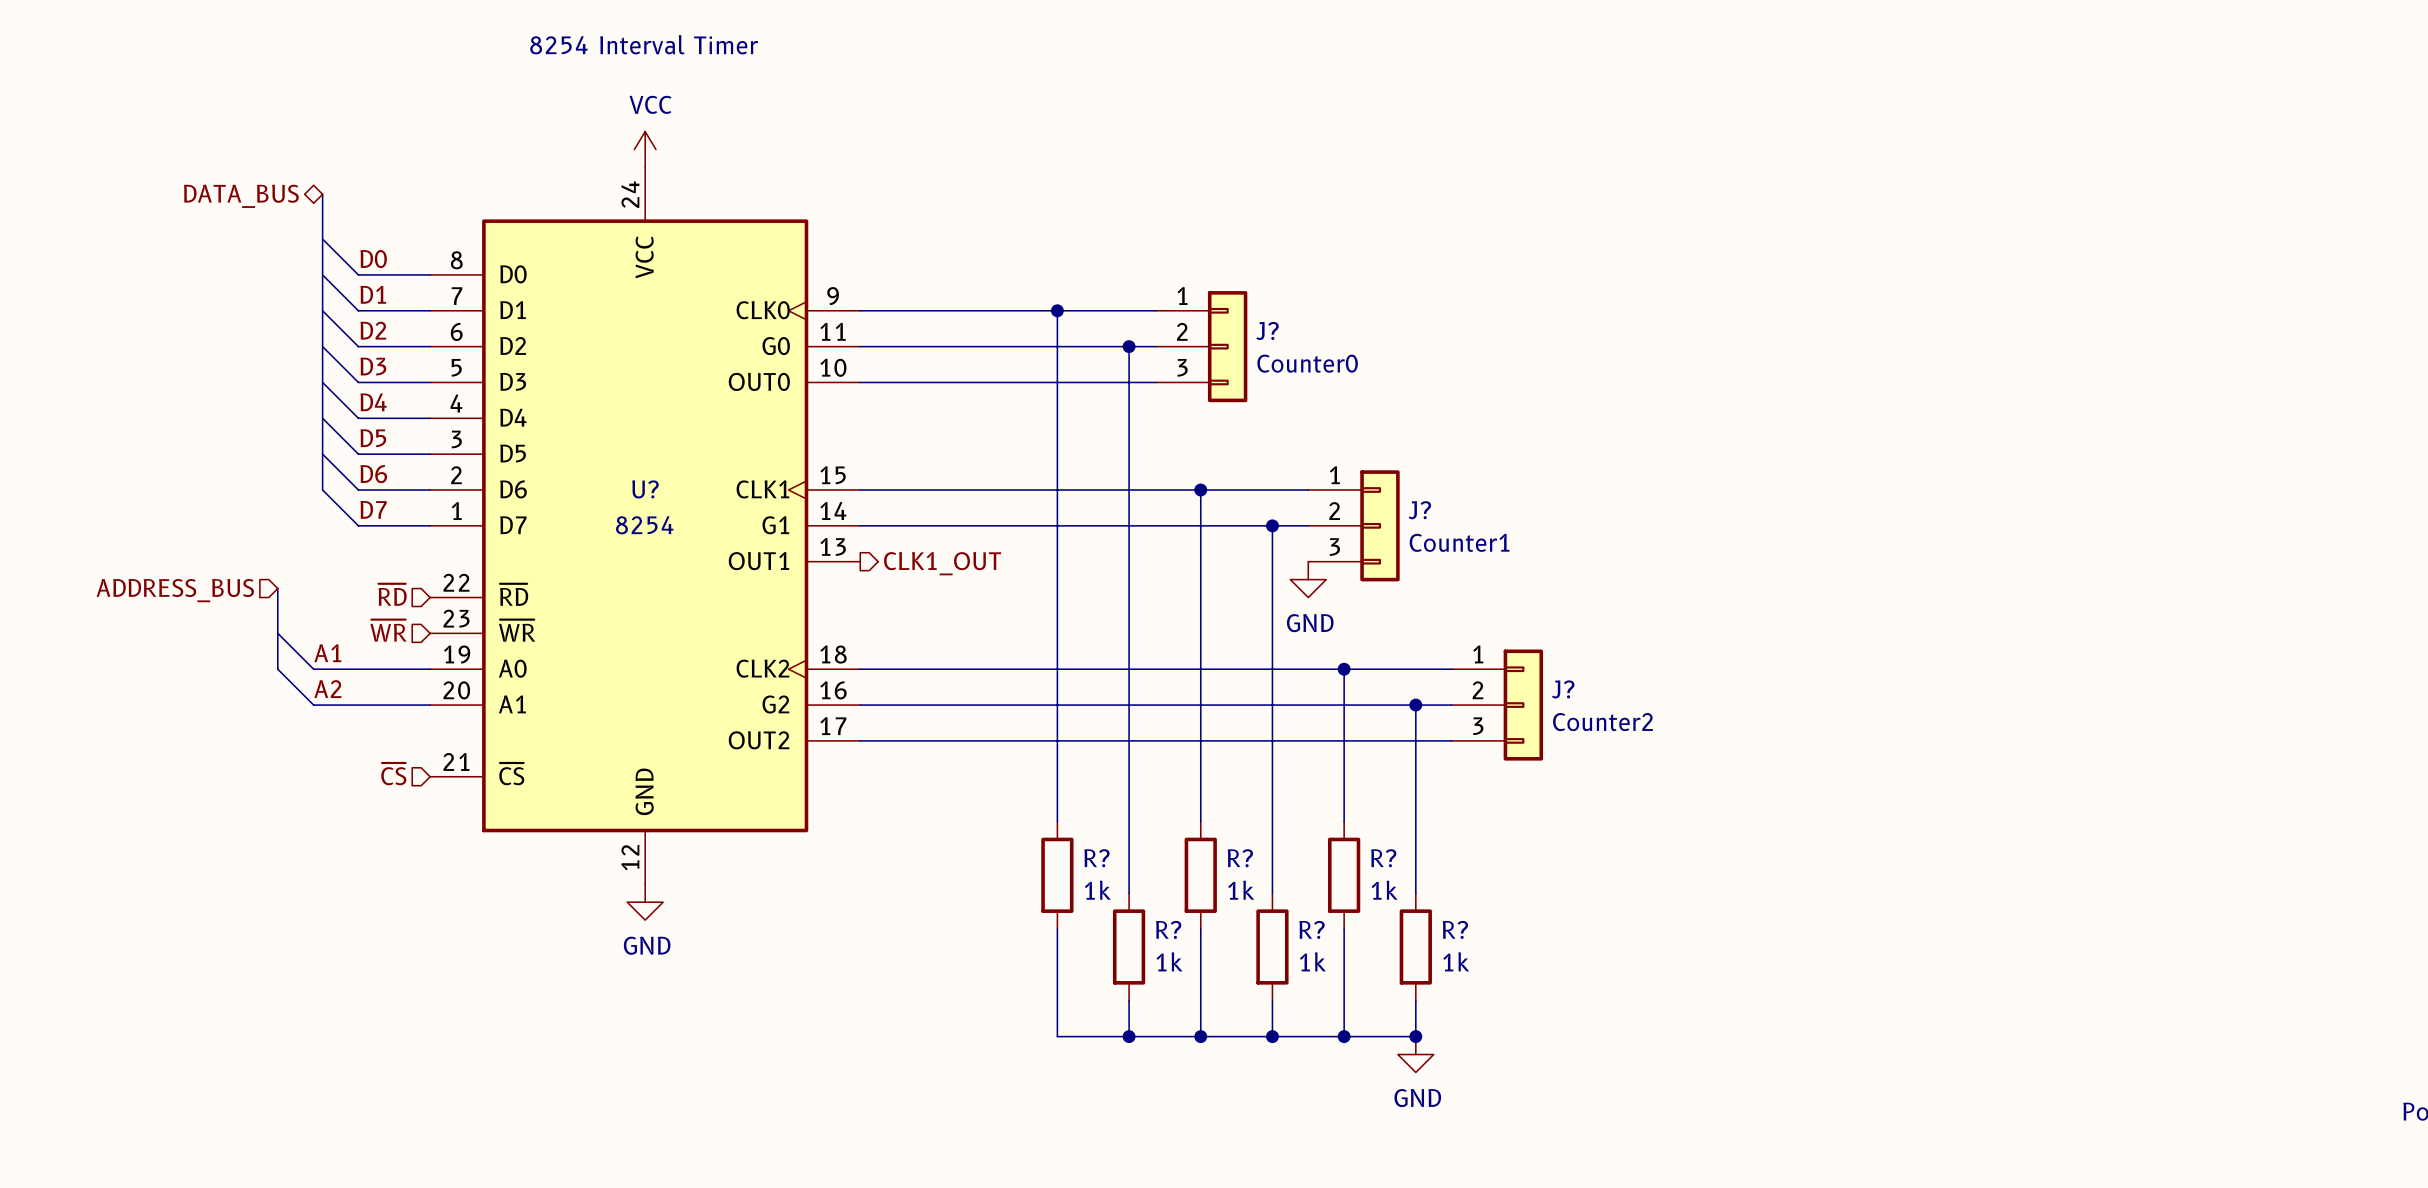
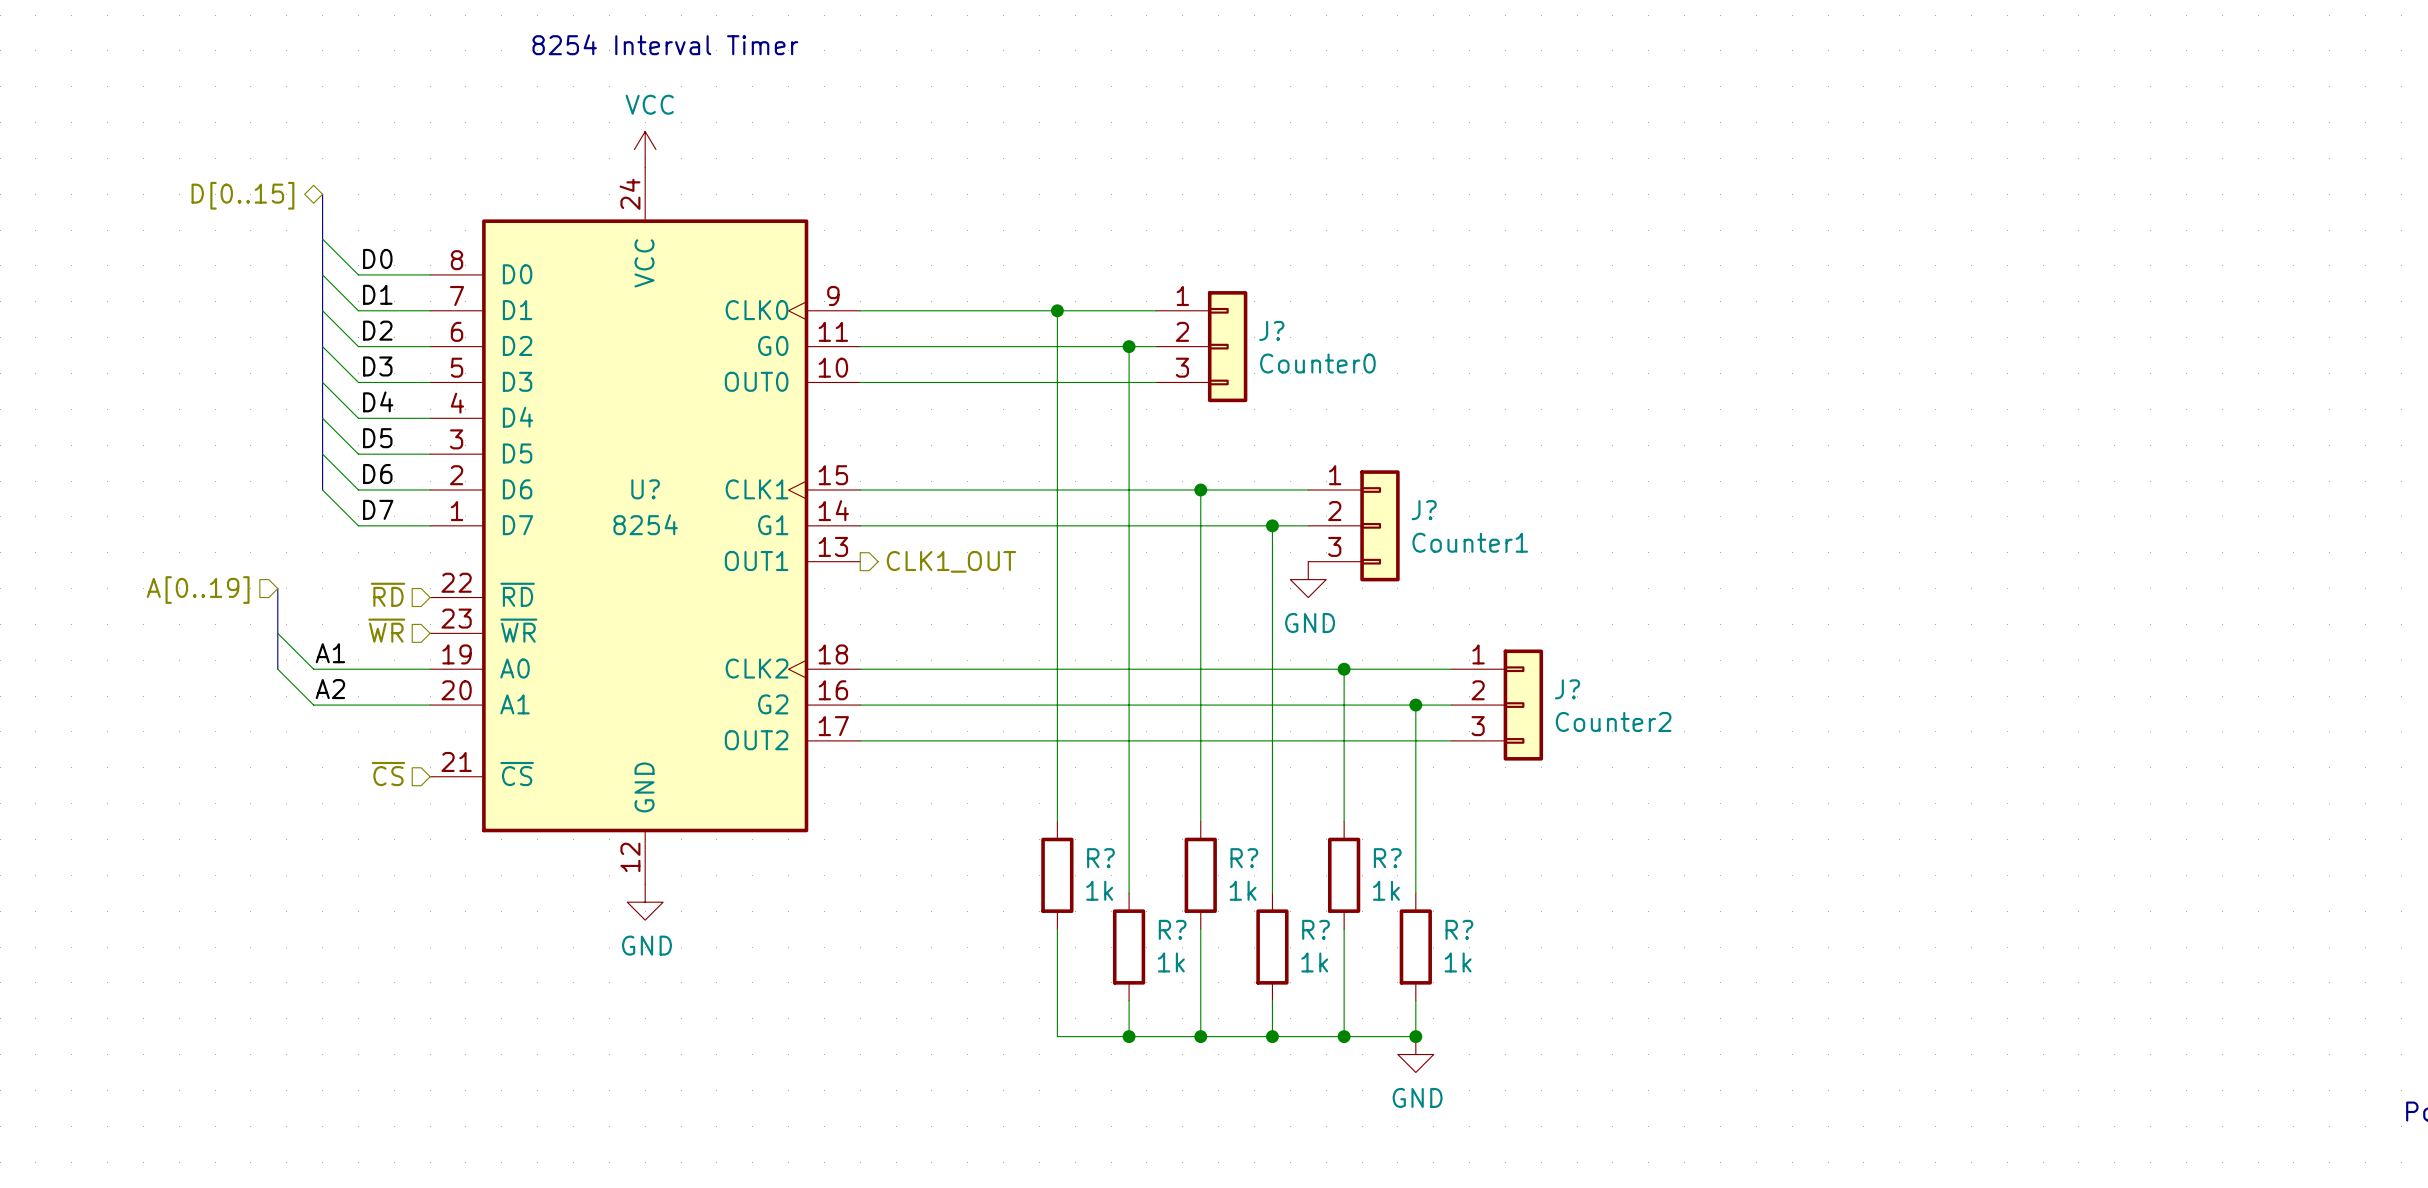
hierarchical label: DATA_BUS (241, 196) -> D[0..15] (242, 195)
hierarchical label: ADDRESS_BUS (175, 590) -> A[0..19] (198, 590)

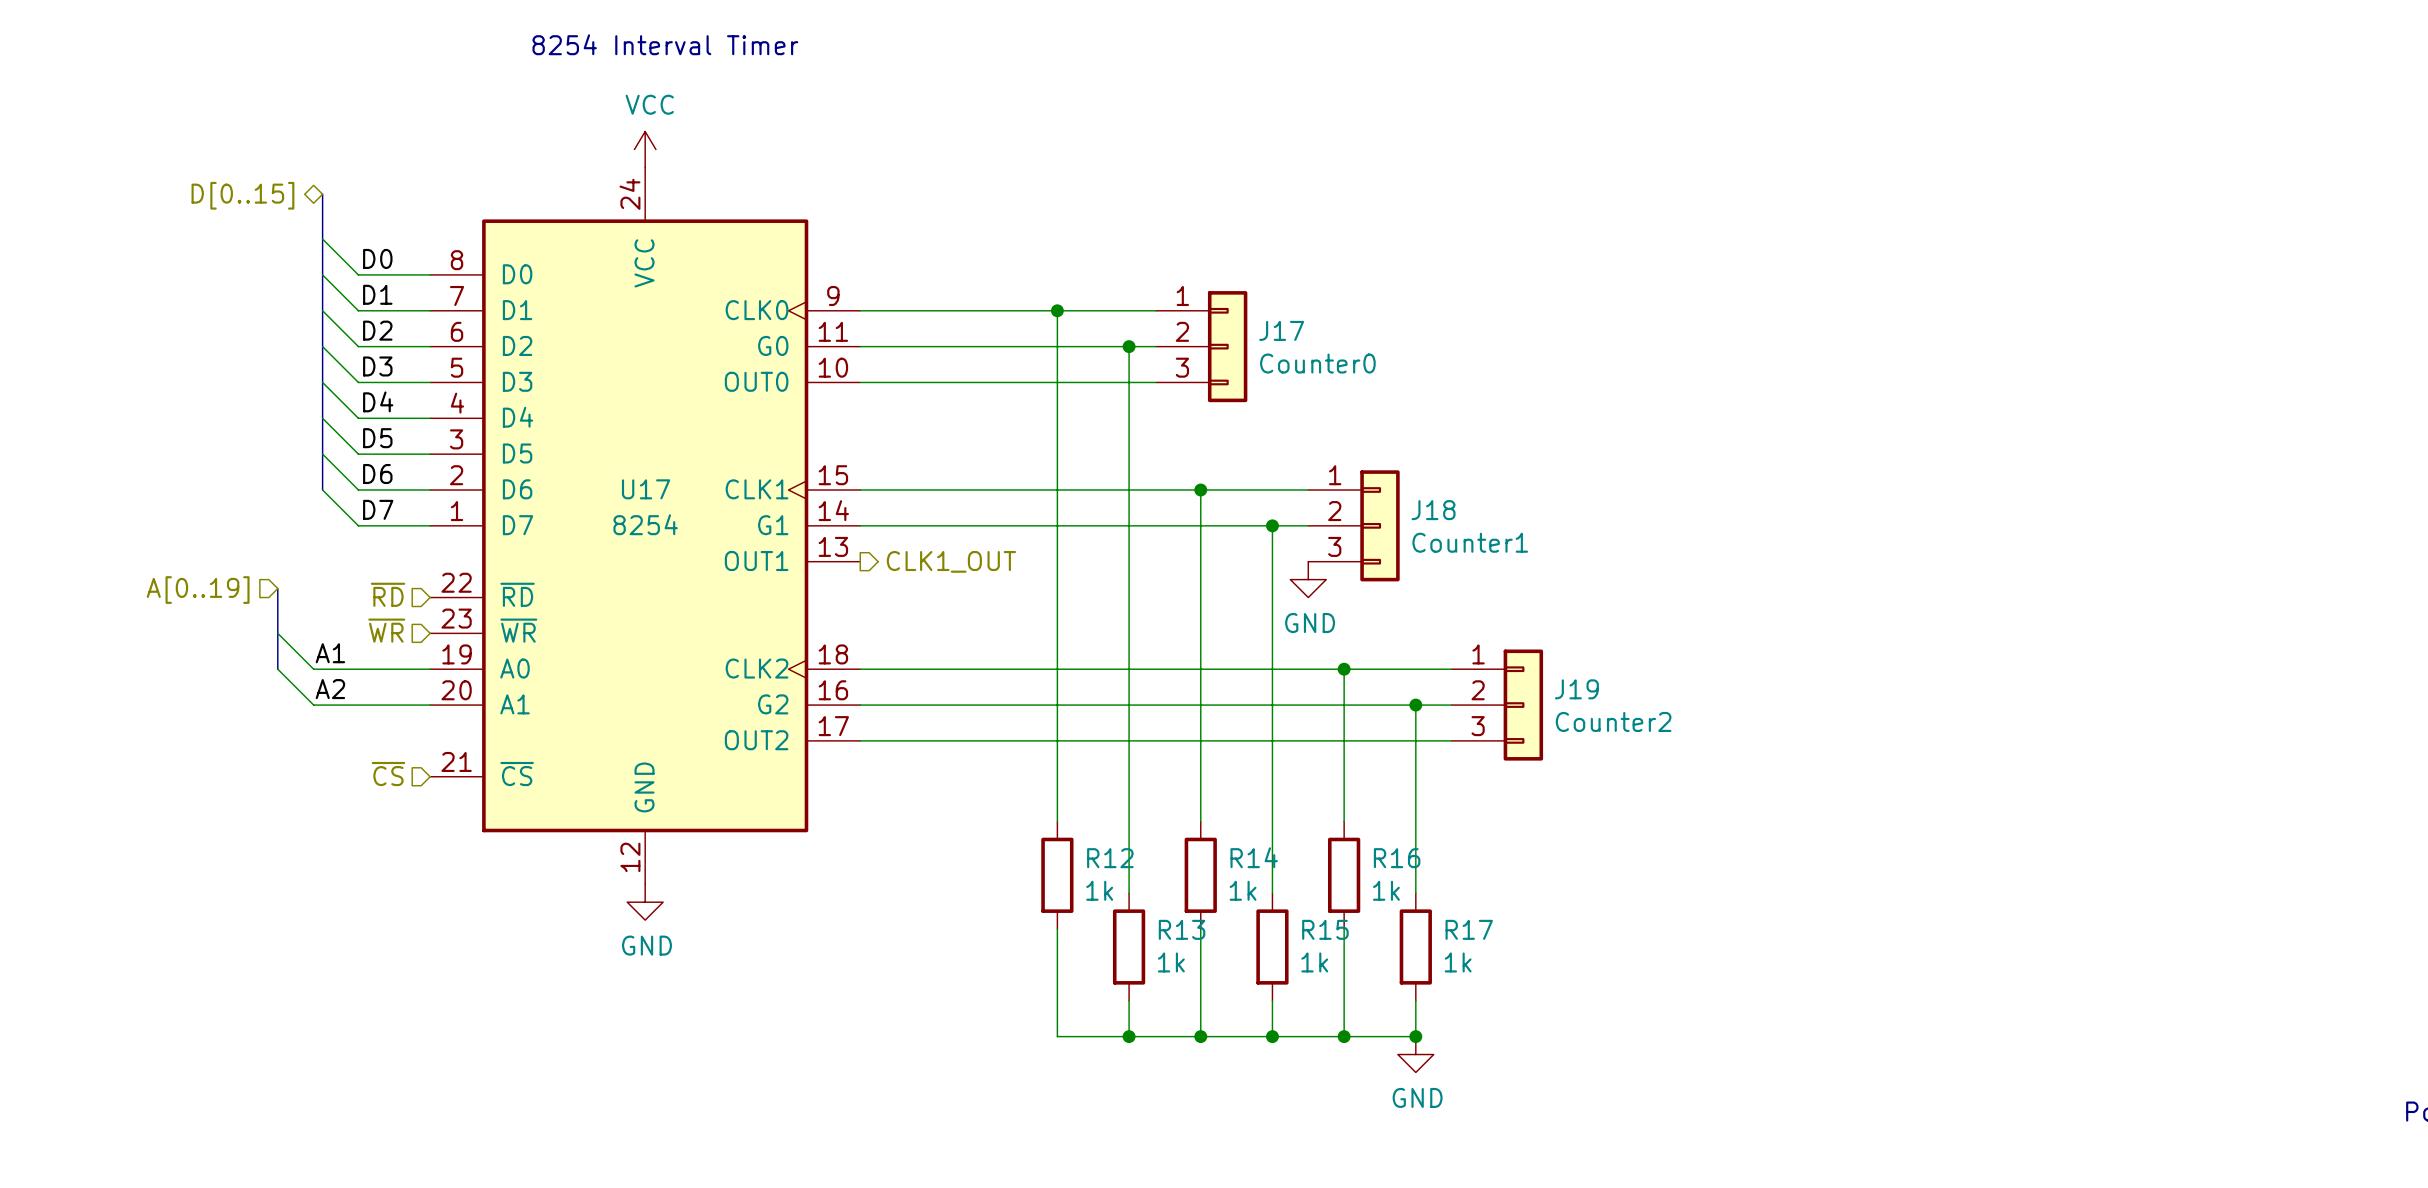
J? name: J? (1271, 330) -> J17 (1281, 330)
U? name: U? (645, 489) -> U17 (646, 489)
J? name: J? (1424, 510) -> J18 (1433, 510)
J? name: J? (1567, 689) -> J19 (1576, 689)
R? name: R? (1100, 858) -> R12 (1110, 858)
R? name: R? (1244, 858) -> R14 (1254, 857)
R? name: R? (1387, 858) -> R16 (1397, 858)
R? name: R? (1172, 929) -> R13 (1182, 929)
R? name: R? (1316, 929) -> R15 (1325, 929)
R? name: R? (1459, 929) -> R17 (1469, 929)

